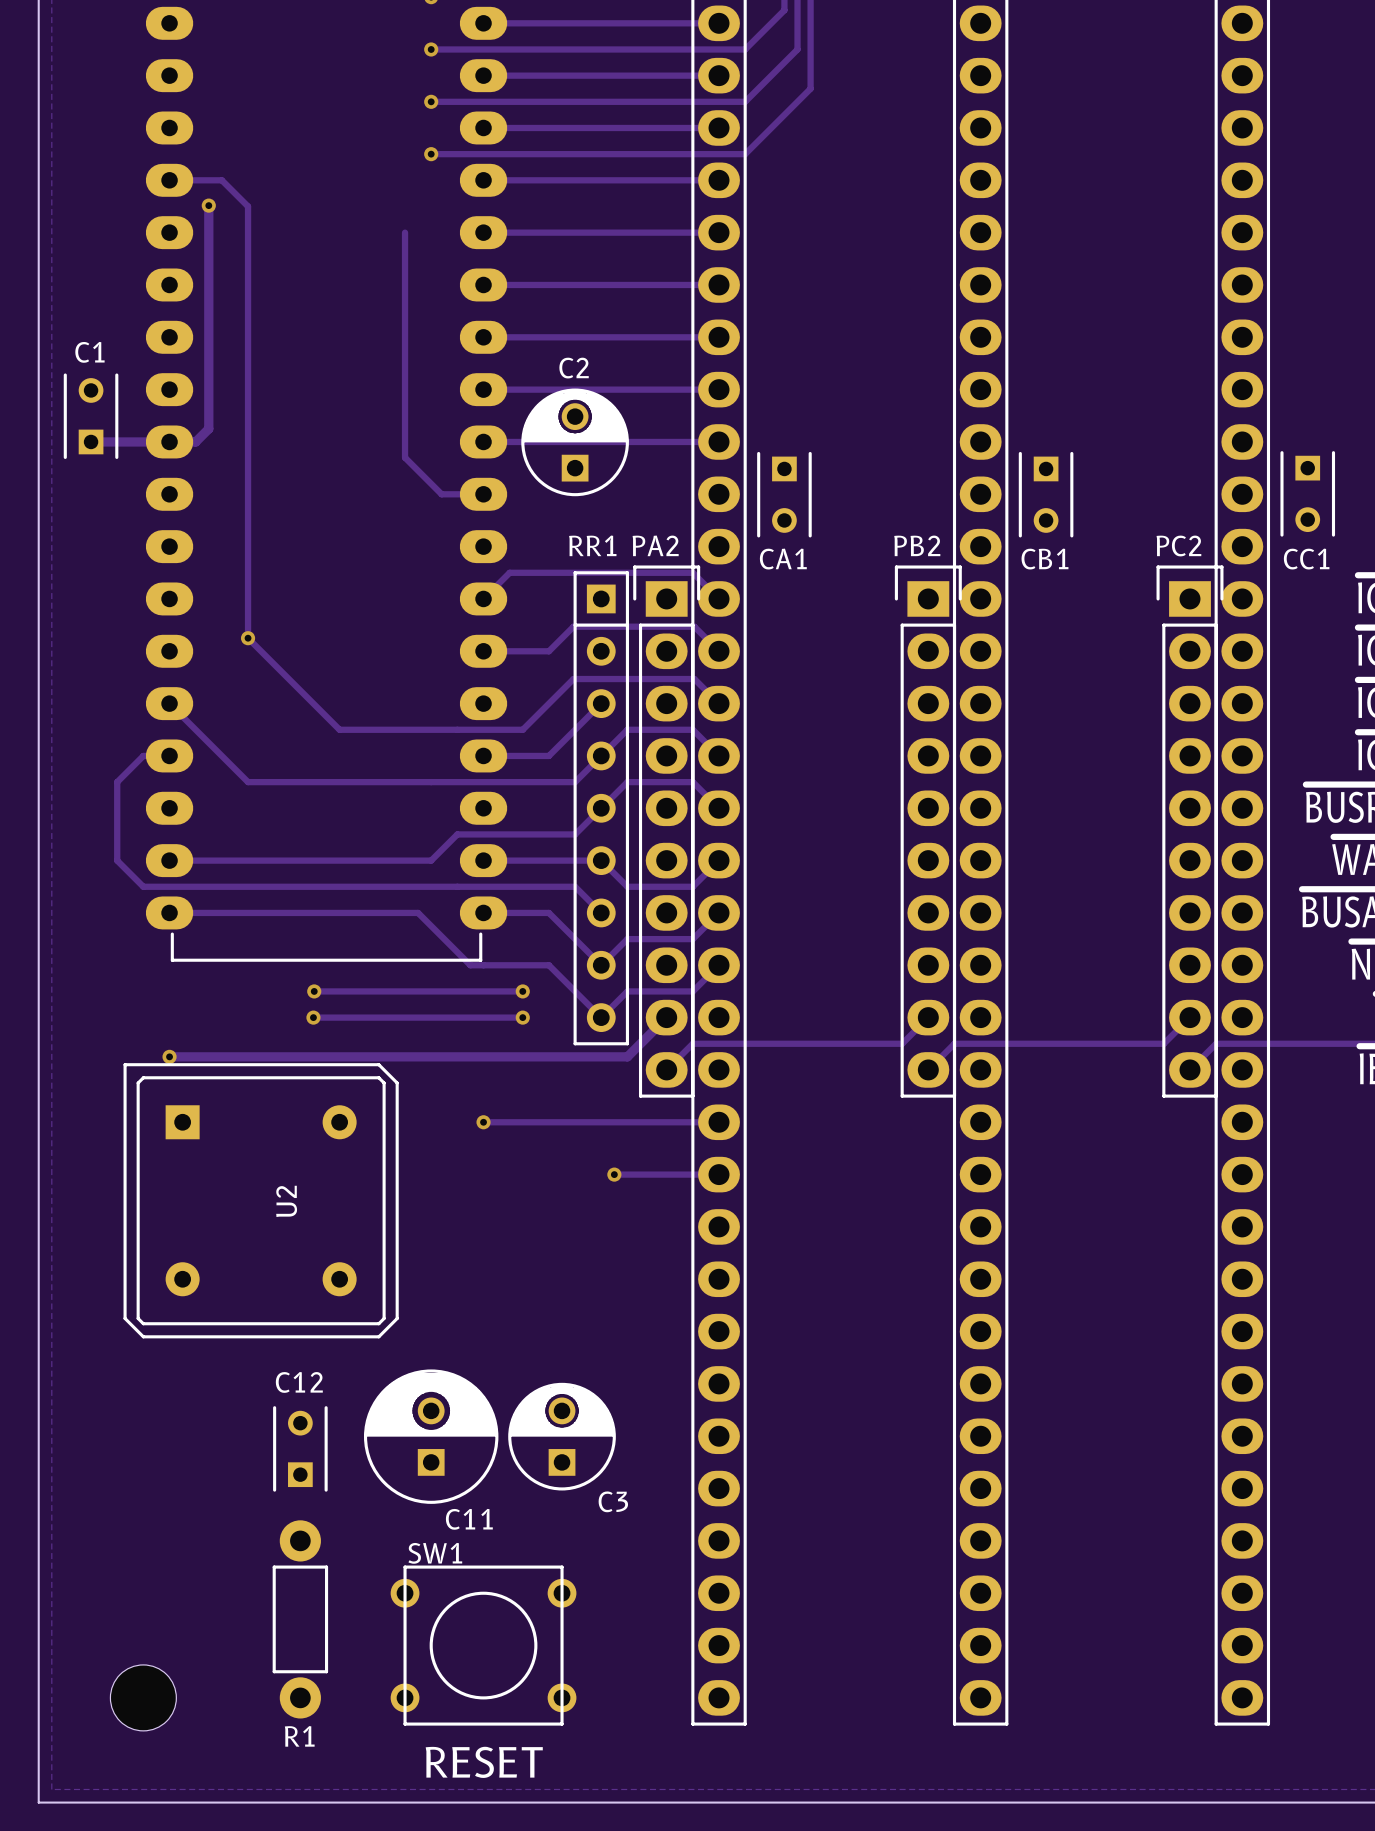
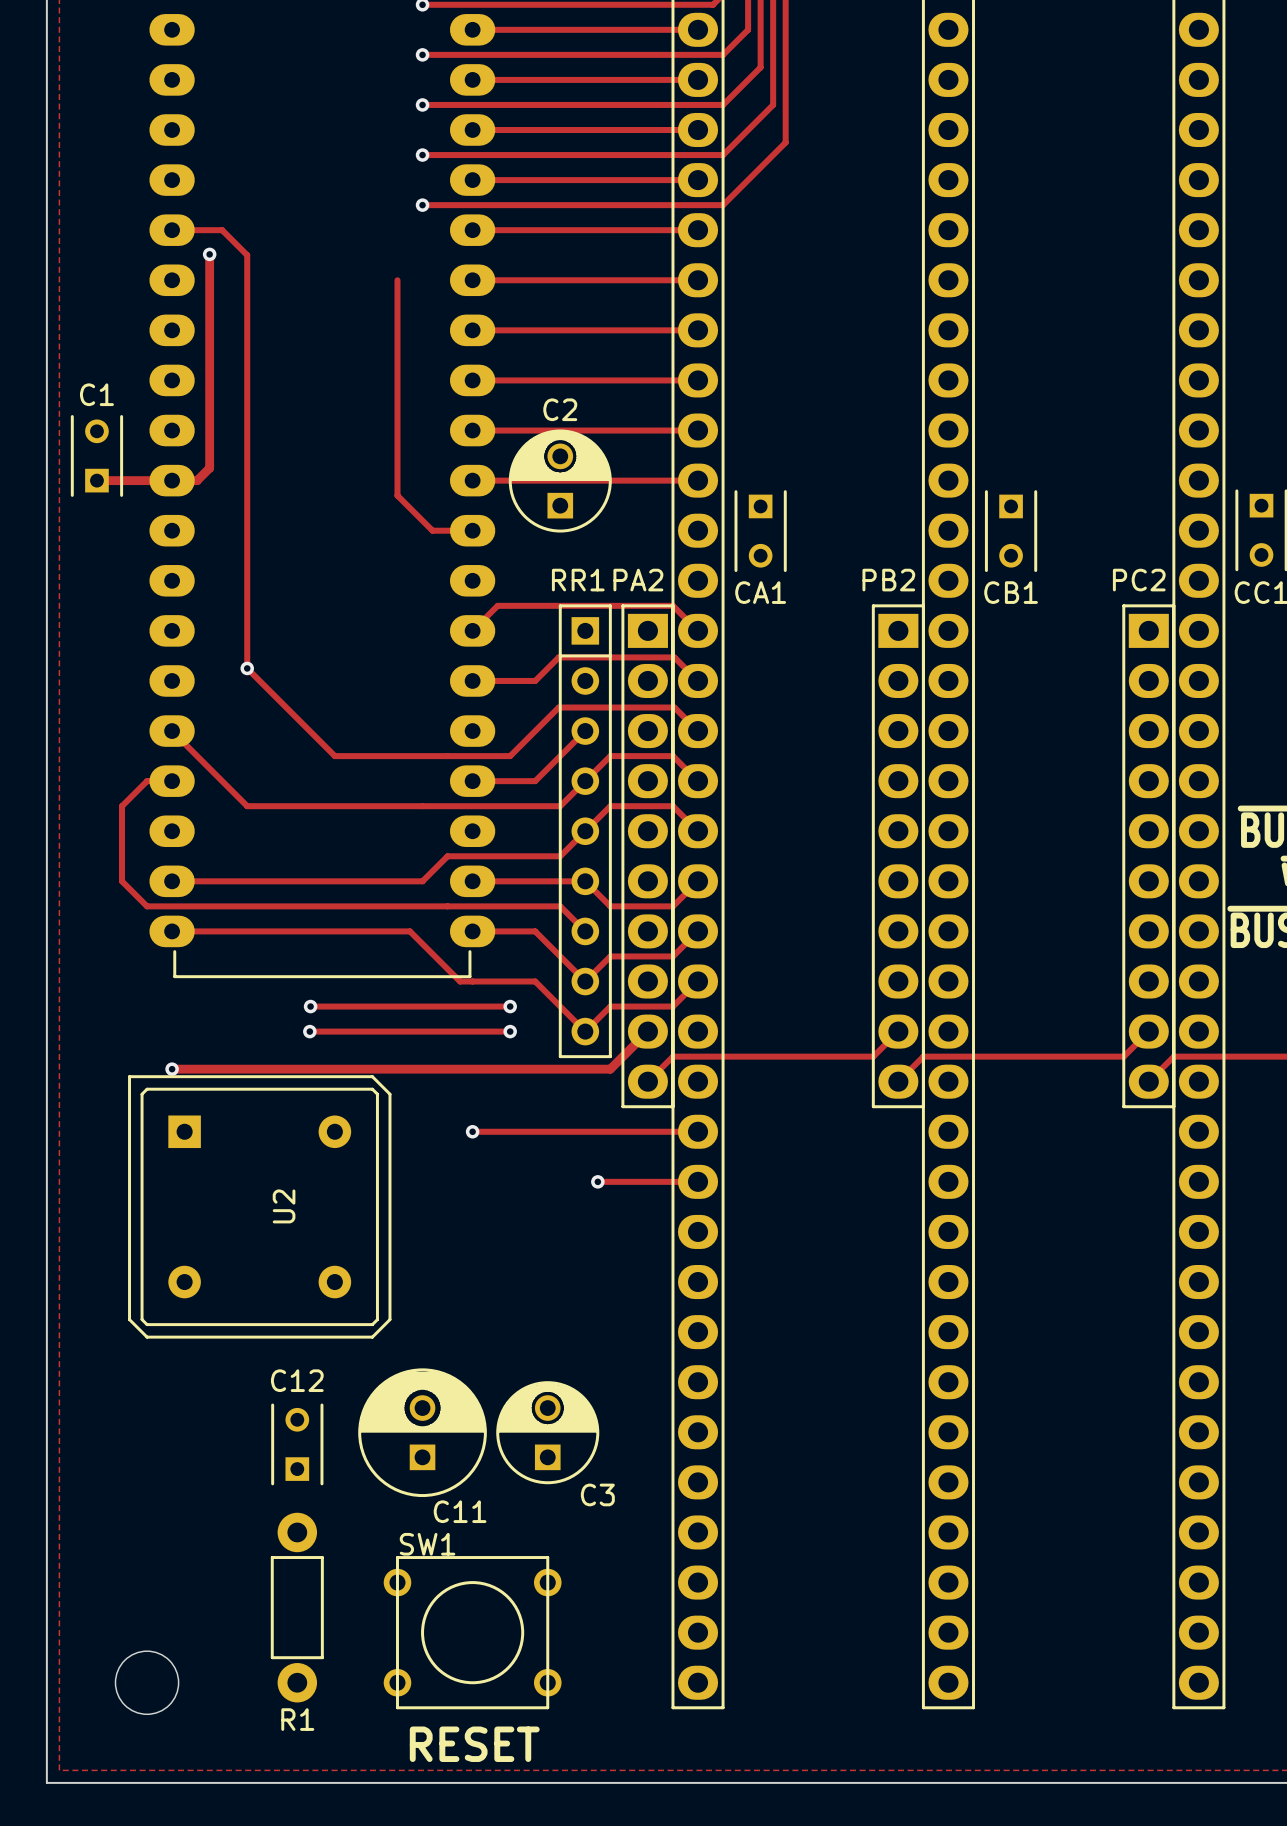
PA2 footprint: [633, 565, 701, 1098] -> [621, 604, 675, 1109]
PB2 footprint: [894, 565, 962, 1098] -> [871, 604, 925, 1109]
PC2 footprint: [1156, 565, 1224, 1098] -> [1122, 604, 1176, 1109]

